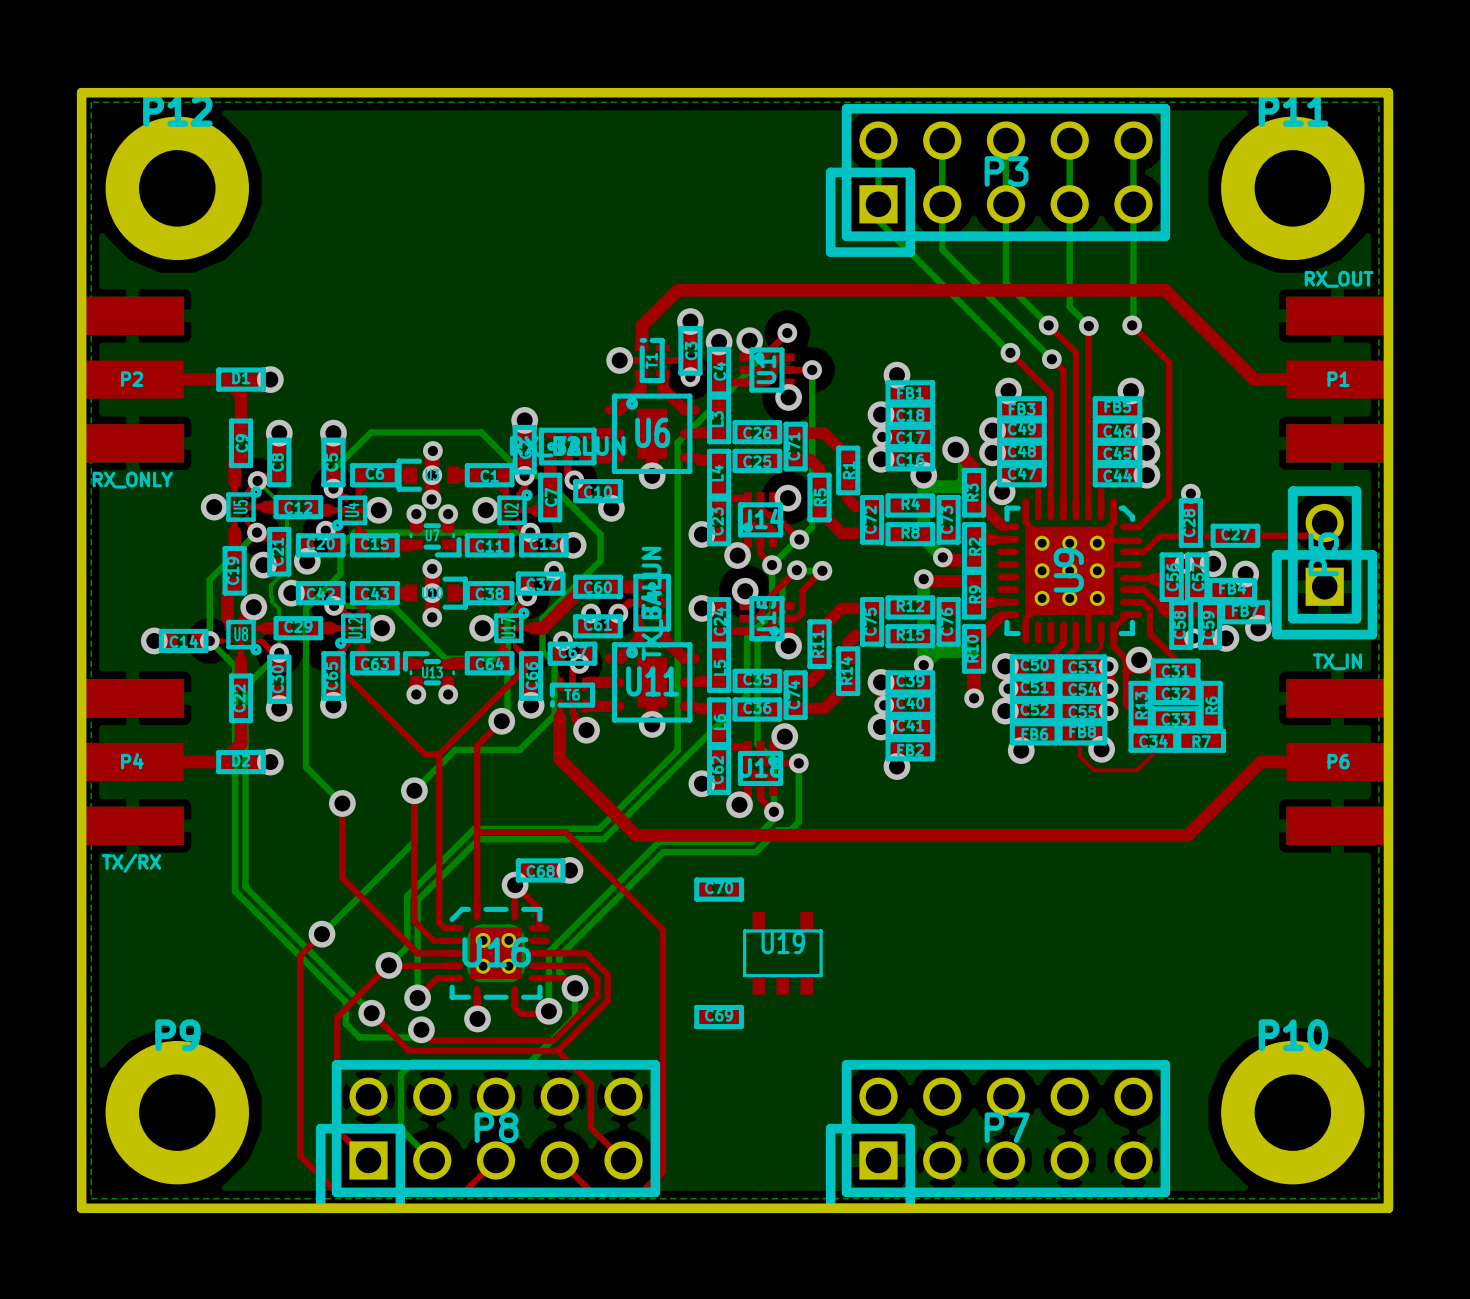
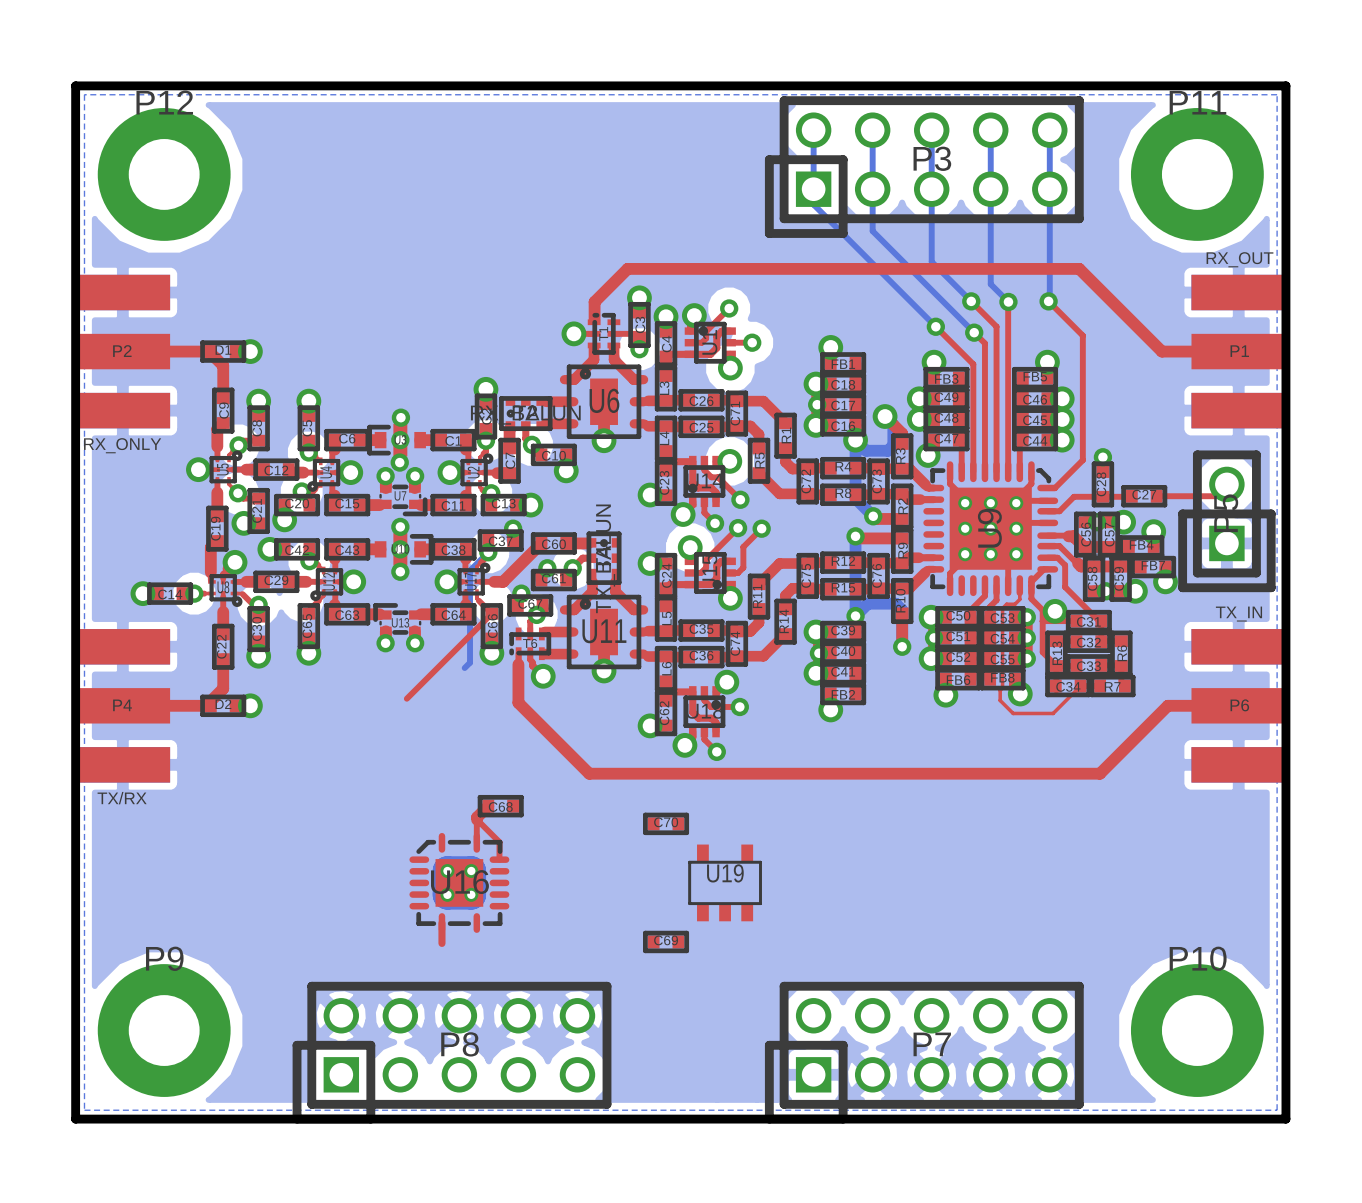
bottom track: (787, 333) (677, 442) (677, 750) (599, 828) (474, 828) (407, 896) (407, 947) (388, 965) -> none
bottom track: (812, 370) (812, 526) (772, 565) (772, 612) (747, 637) (747, 695) (603, 839) (478, 839) (417, 900) (417, 997) -> none
bottom track: (257, 480) (286, 510) (286, 569) (270, 585) (272, 602) (279, 609) (279, 653) (245, 686) (245, 887) (371, 1013) -> none
bottom track: (333, 488) (333, 470) (371, 432) (481, 432) (524, 475) (541, 475) (600, 534) (600, 560) (542, 618) (542, 651) (554, 663) (554, 714) (519, 749) (455, 749) (414, 790) (414, 841) (321, 934) -> none
bottom track: (325, 530) (340, 545) (340, 574) (306, 608) (306, 767) (342, 803) -> none
bottom track: (256, 532) (209, 579) (209, 640) (235, 666) (235, 891) (345, 1002) (345, 1023) (359, 1037) (413, 1037) (421, 1029) -> none
bottom track: (530, 532) (354, 532) (340, 546) -> none
bottom track: (822, 570) (796, 570) (782, 584) (782, 617) (757, 642) (757, 744) (773, 760) (773, 819) (751, 841) (659, 841) (548, 952) (548, 1011) -> none
bottom track: (334, 605) (392, 605) (445, 658) (507, 658) -> none
top track: (333, 662) (425, 754) (439, 754) (439, 922) (444, 928) (452, 928) -> none
top track: (501, 721) (477, 745) (477, 910) -> none
via: (501, 721) -> none
bottom track: (798, 763) (798, 821) (790, 830) (777, 830) (755, 852) (663, 852) (559, 956) (559, 972) (575, 988) (575, 1017) (529, 1062) (413, 1062) (401, 1074) (401, 1129) (432, 1160) -> none
top track: (414, 790) (414, 921) (433, 940) (452, 940) -> none
via: (414, 790) -> none
top track: (342, 803) (342, 878) (417, 953) (452, 953) -> none
via: (342, 803) -> none
top track: (477, 832) (565, 832) (663, 929) (663, 1171) (641, 1192) (592, 1192) (559, 1160) -> none
via: (569, 870) -> none
via: (515, 885) -> none
top track: (321, 934) (300, 955) (300, 1156) (336, 1192) (464, 1192) (496, 1160) -> none
via: (321, 934) -> none
top track: (539, 953) (586, 953) (607, 974) (607, 1000) (557, 1050) -> none
via: (388, 965) -> none
top track: (452, 965) (388, 965) (337, 1017) (337, 1129) (368, 1160) -> none
top track: (539, 965) (584, 965) (597, 978) (597, 996) (553, 1040) (432, 1040) (421, 1029) -> none
top track: (452, 978) (437, 978) (417, 997) -> none
top track: (539, 978) (565, 978) (575, 988) -> none
via: (575, 988) -> none
top track: (514, 996) (514, 1007) (520, 1013) (546, 1013) (548, 1011) -> none
via: (417, 997) -> none
via: (548, 1011) -> none
top track: (371, 1013) (409, 1050) (557, 1050) (590, 1083) (590, 1127) (623, 1160) -> none
via: (371, 1013) -> none
via: (477, 1018) -> none
via: (421, 1029) -> none

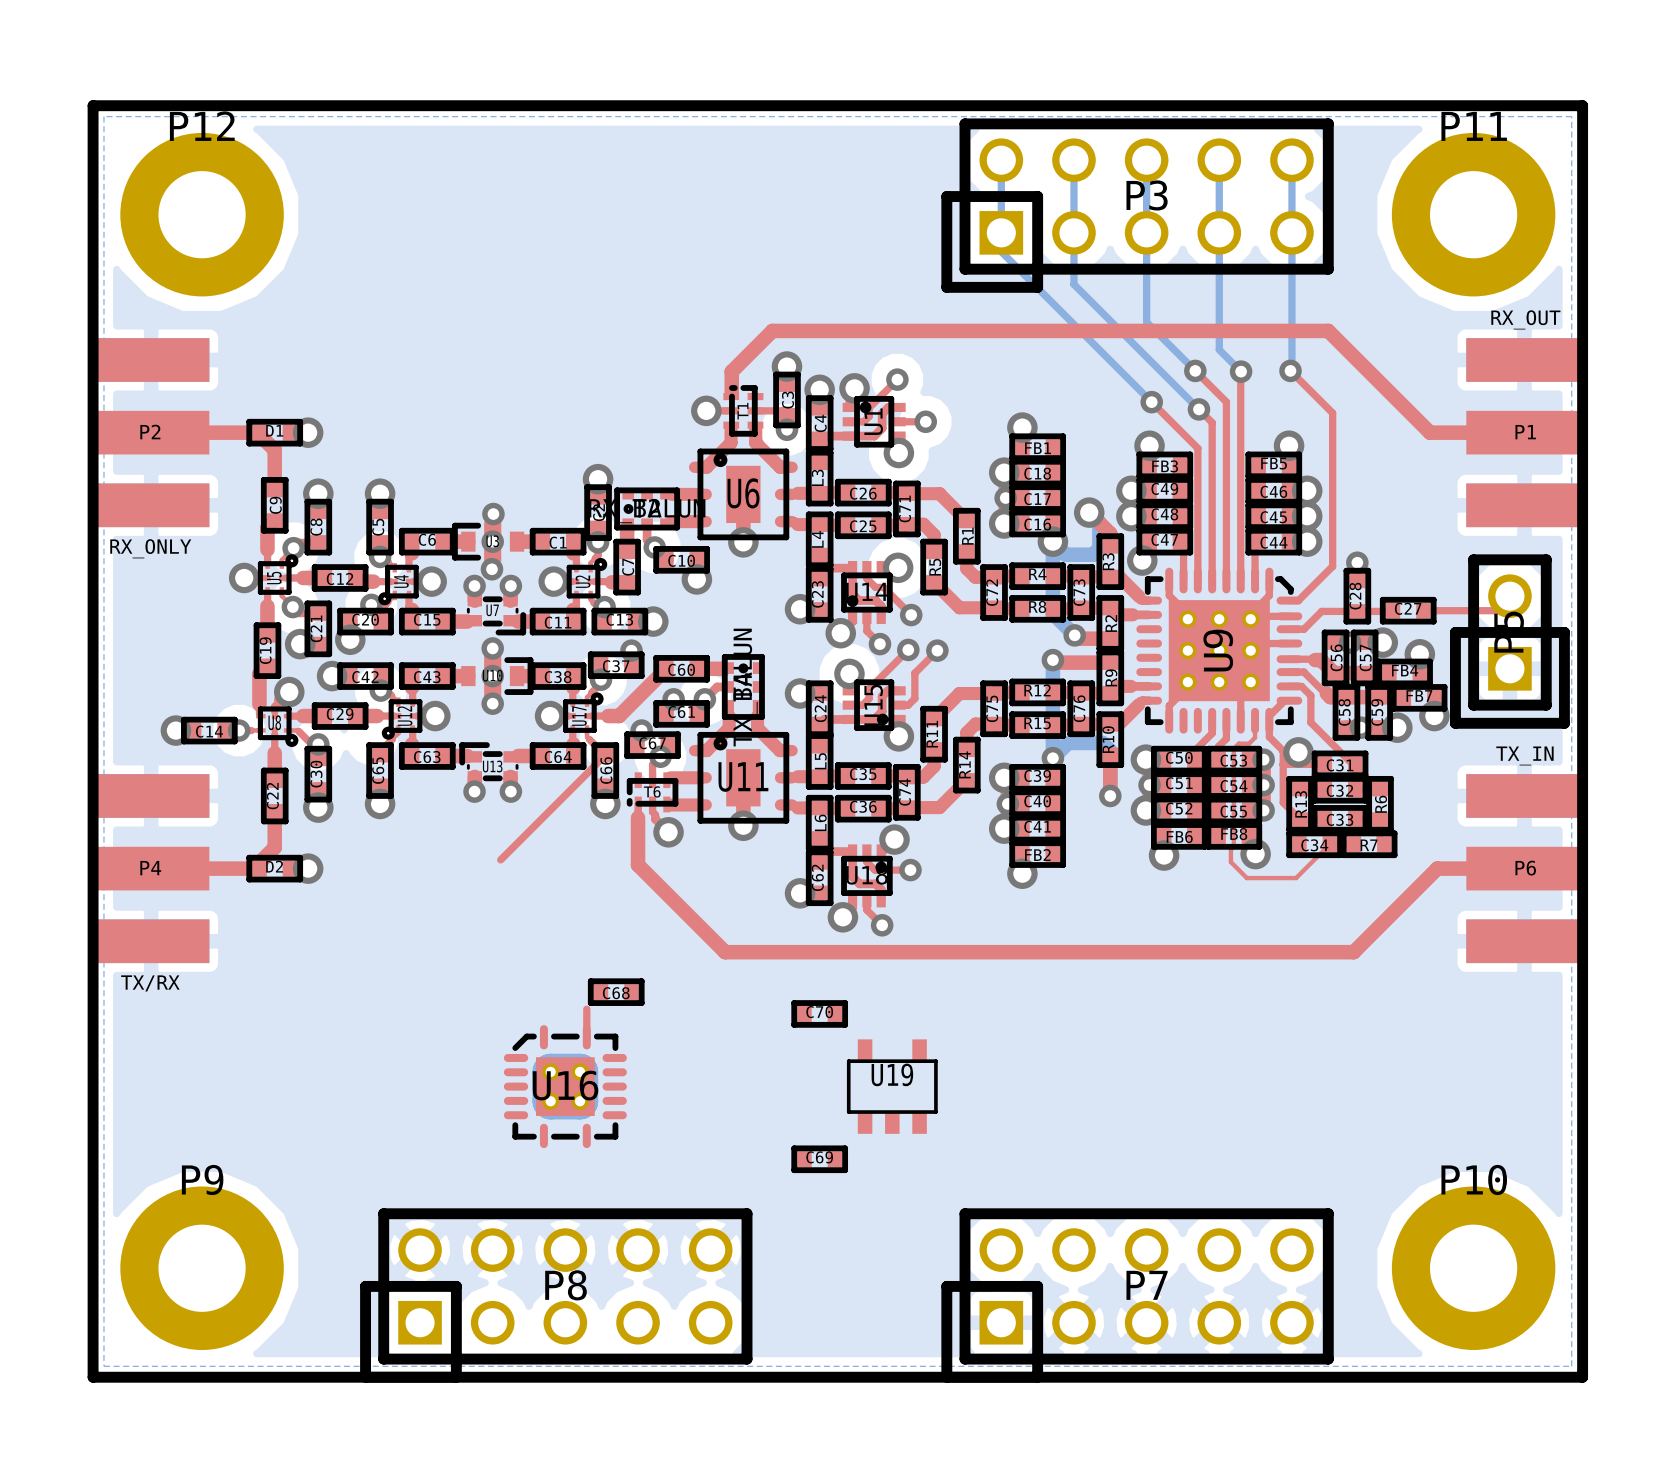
bottom track: (488, 552) (470, 570) (470, 662) (464, 668) -> none
top track: (488, 806) (477, 817) (477, 819) (499, 842) (499, 859) -> none
top track: (441, 923) (441, 943) -> none

